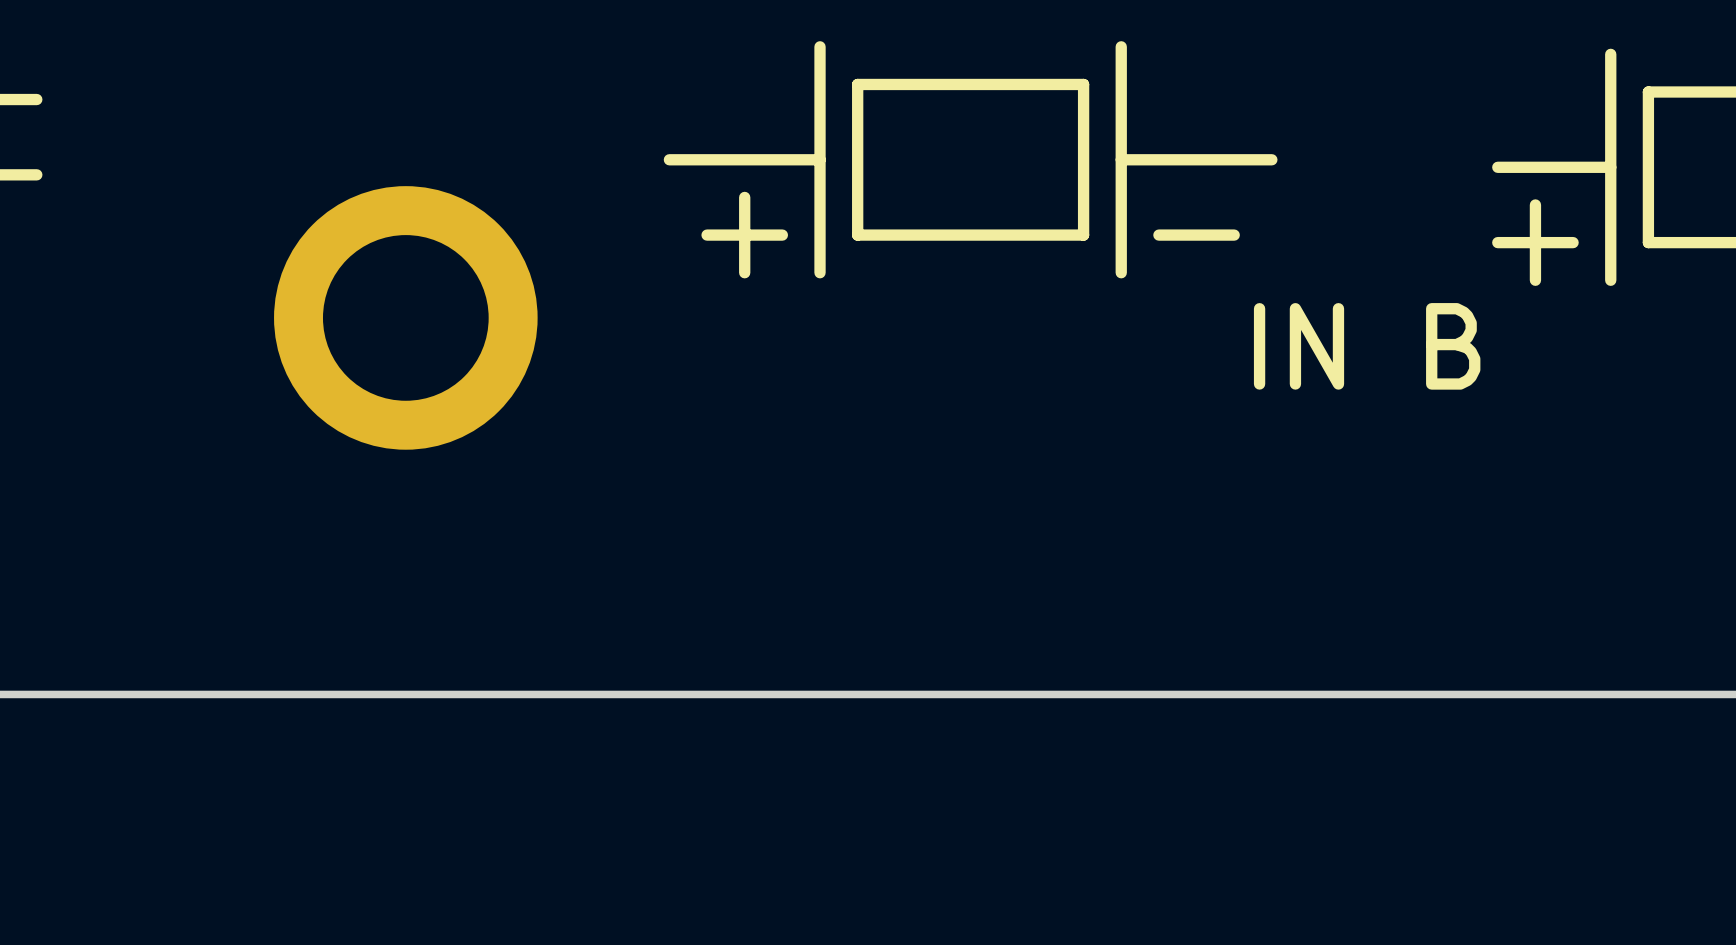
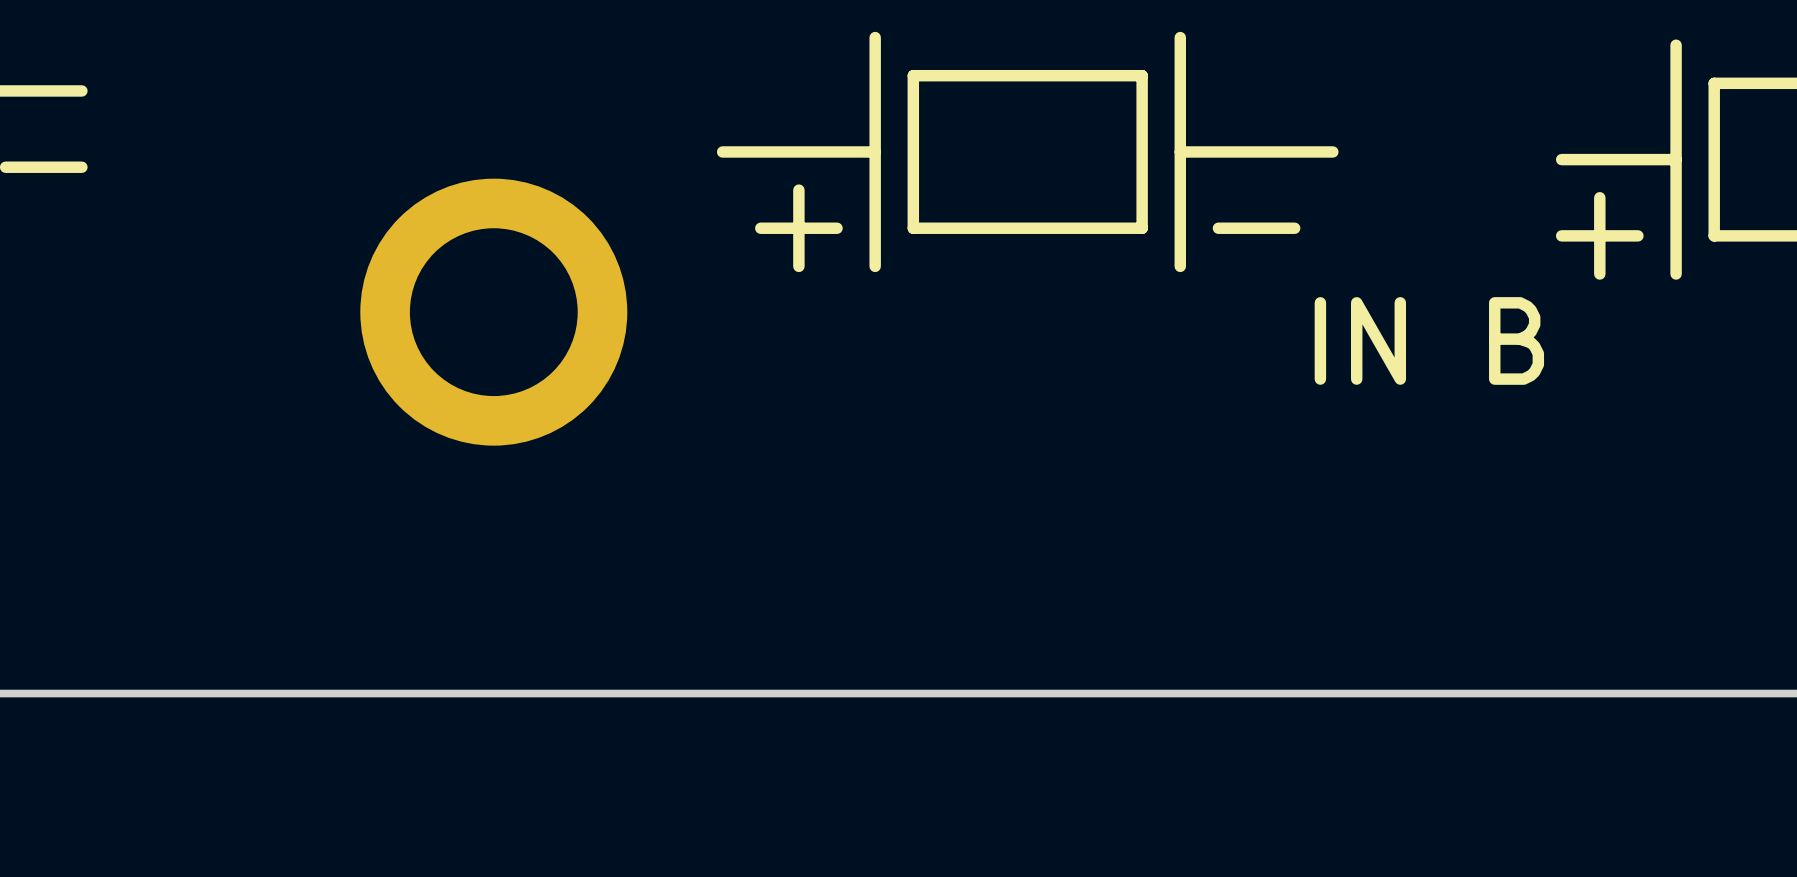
part position: (405, 317) -> (493, 312)

